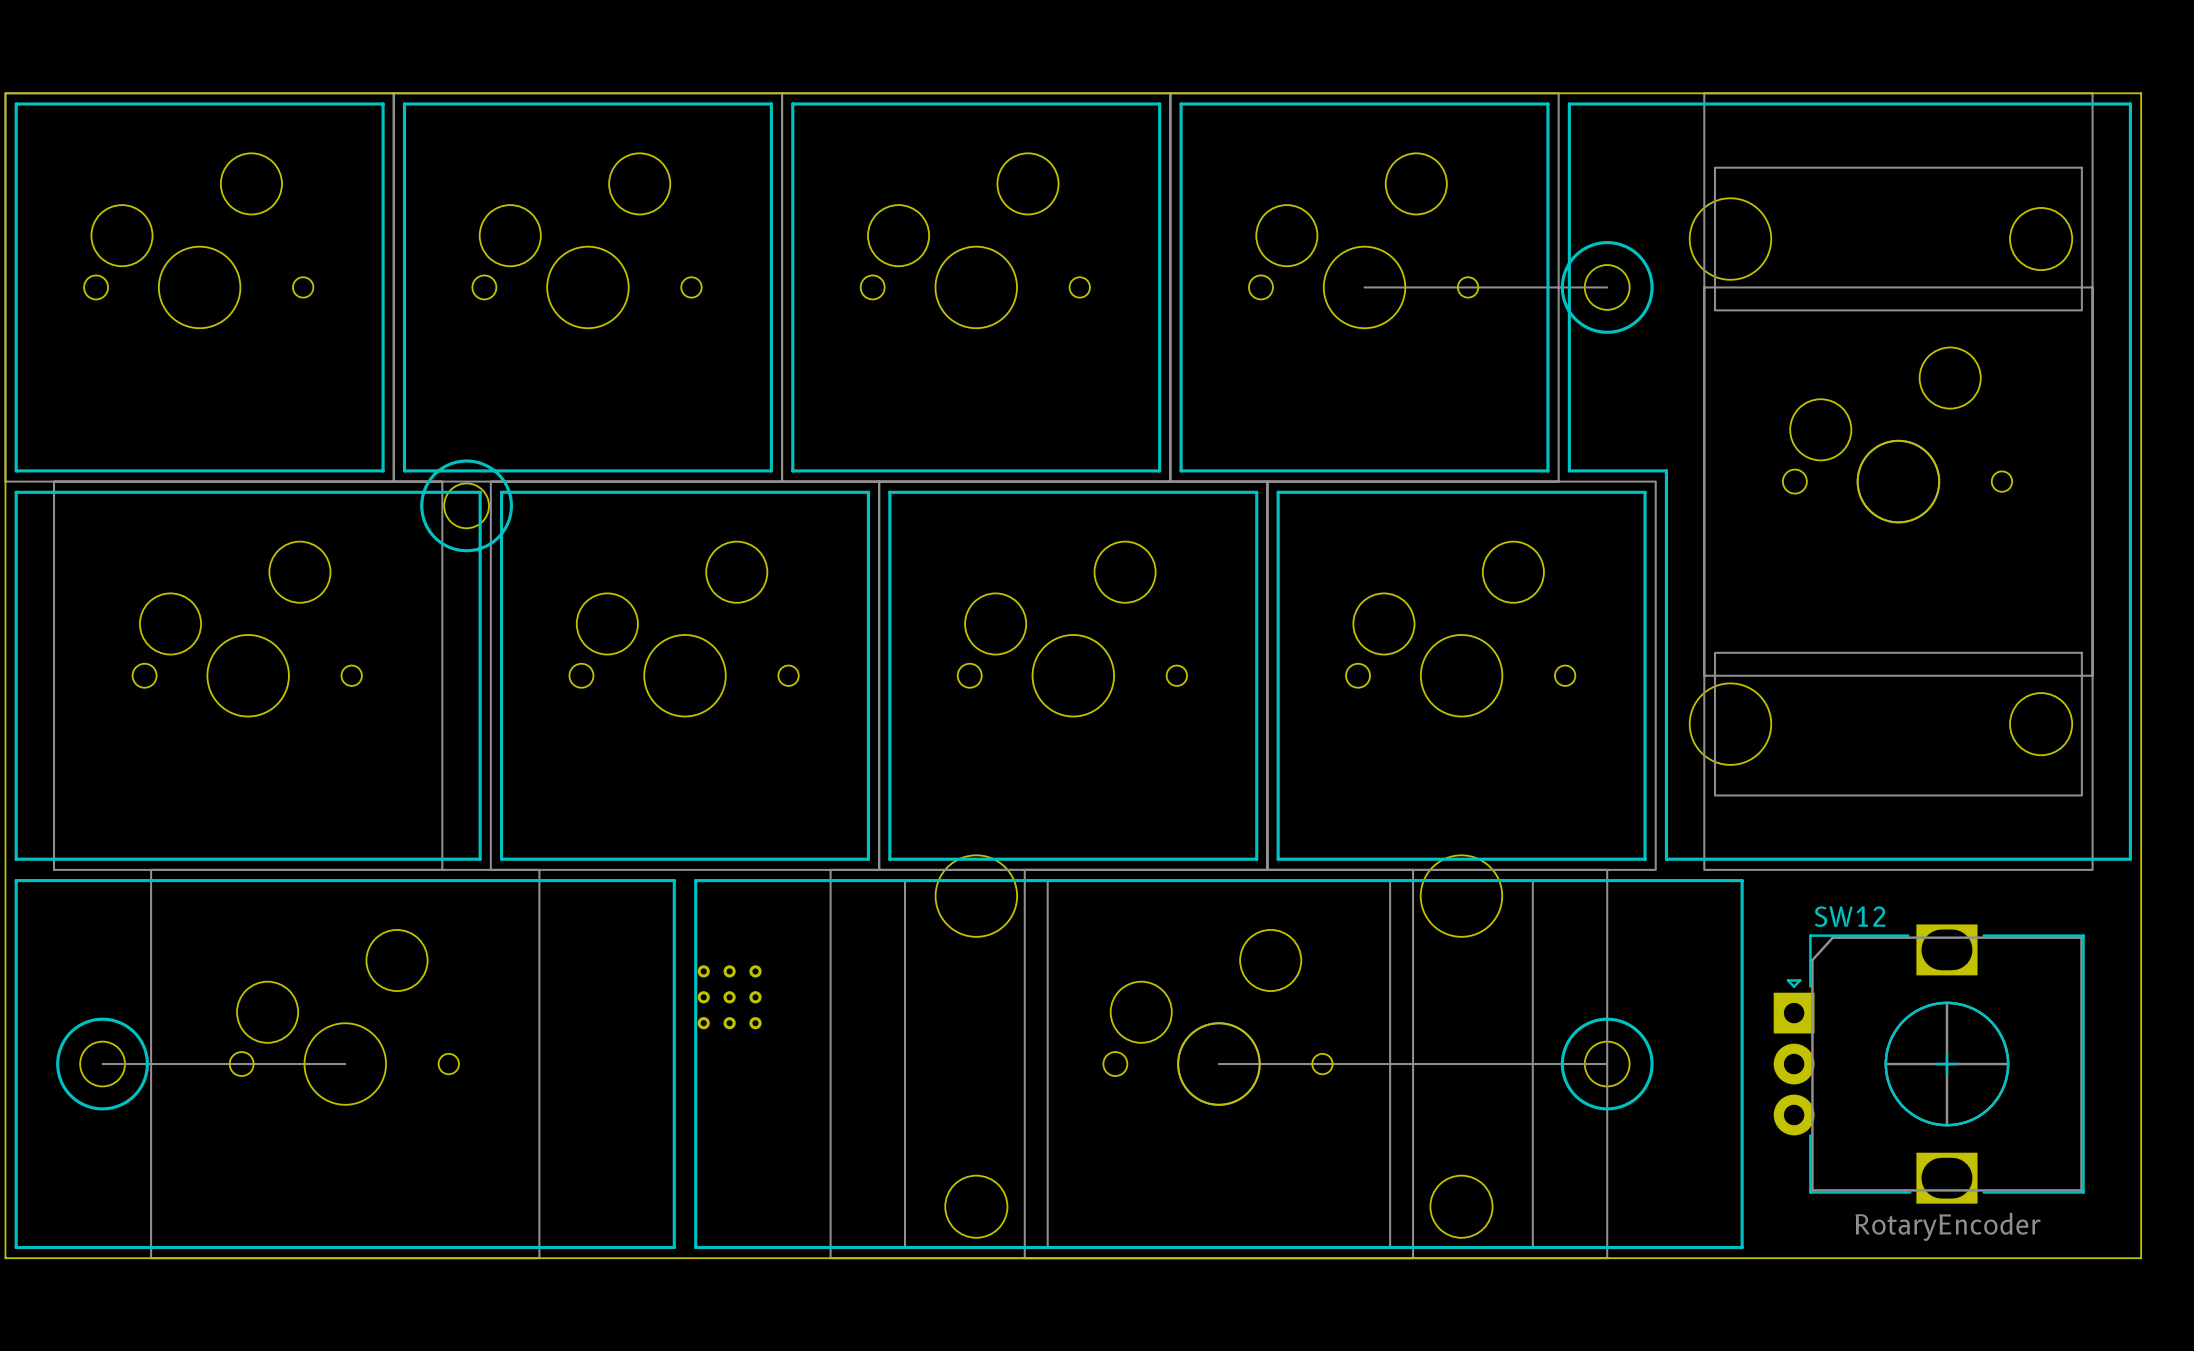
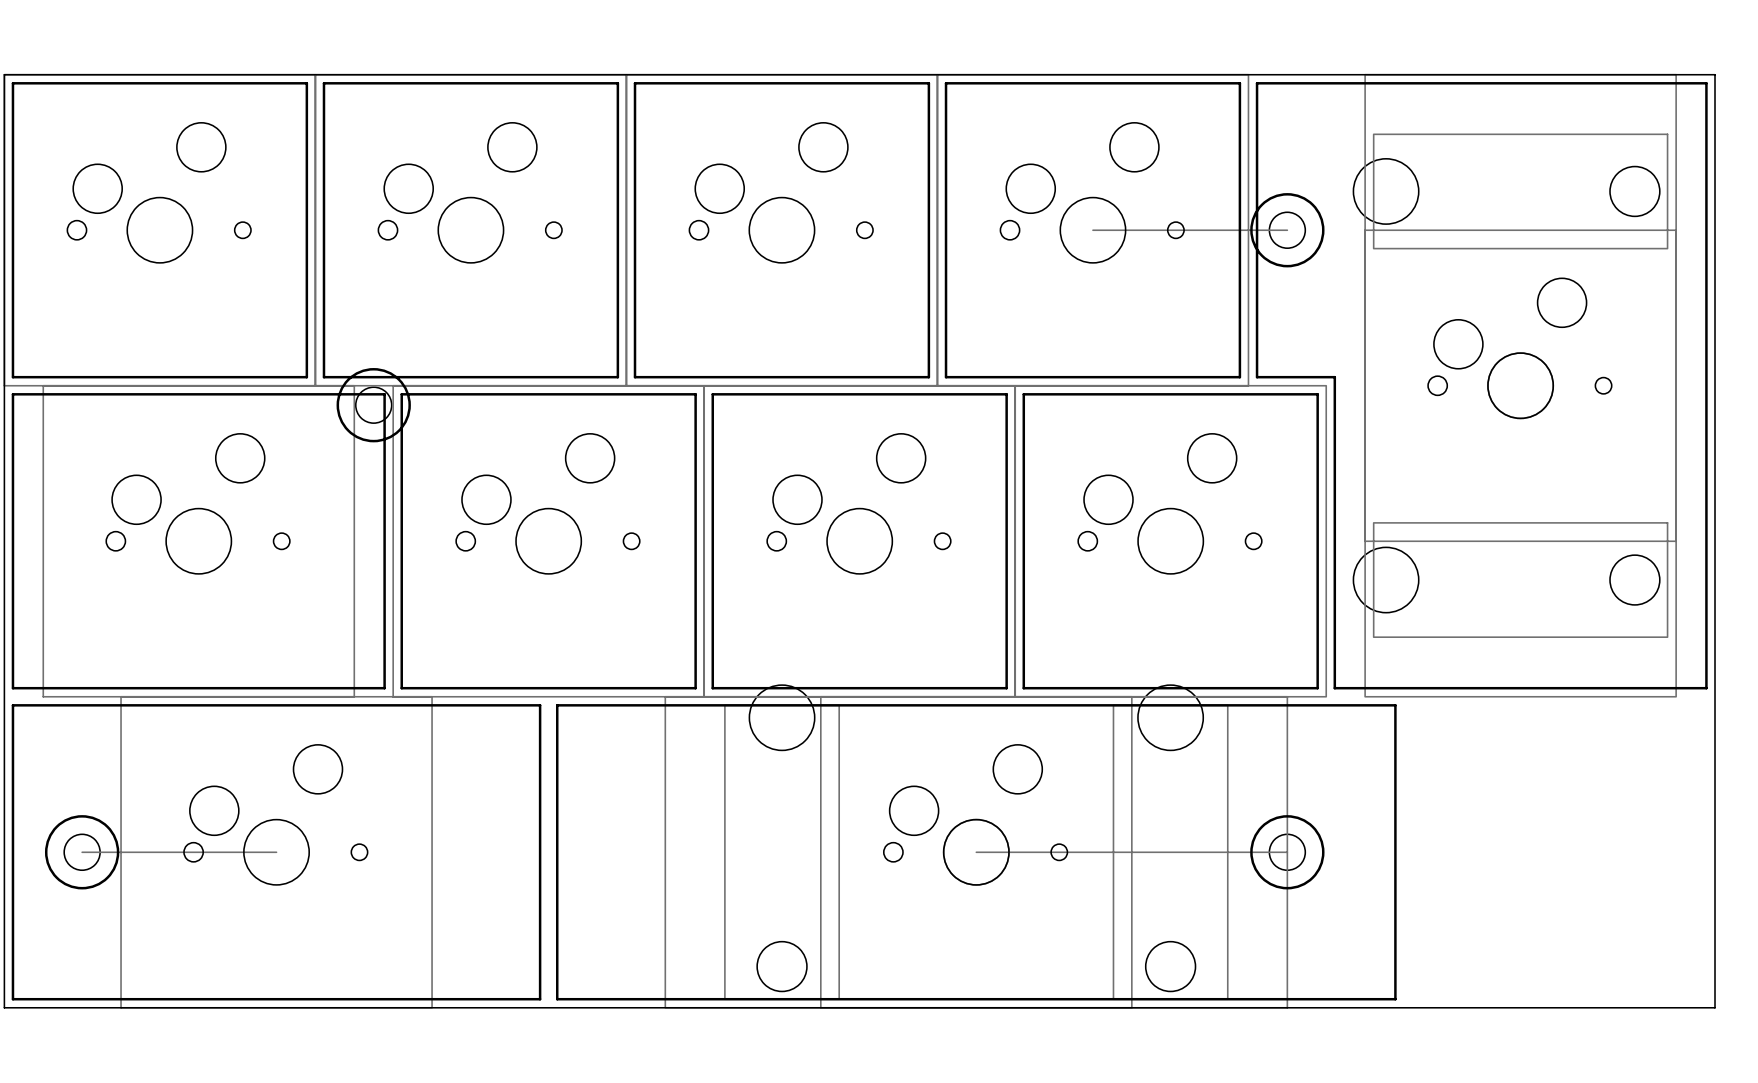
part: (729, 997) -> none
SW12: RotaryEncoder (1929, 1064) -> none

